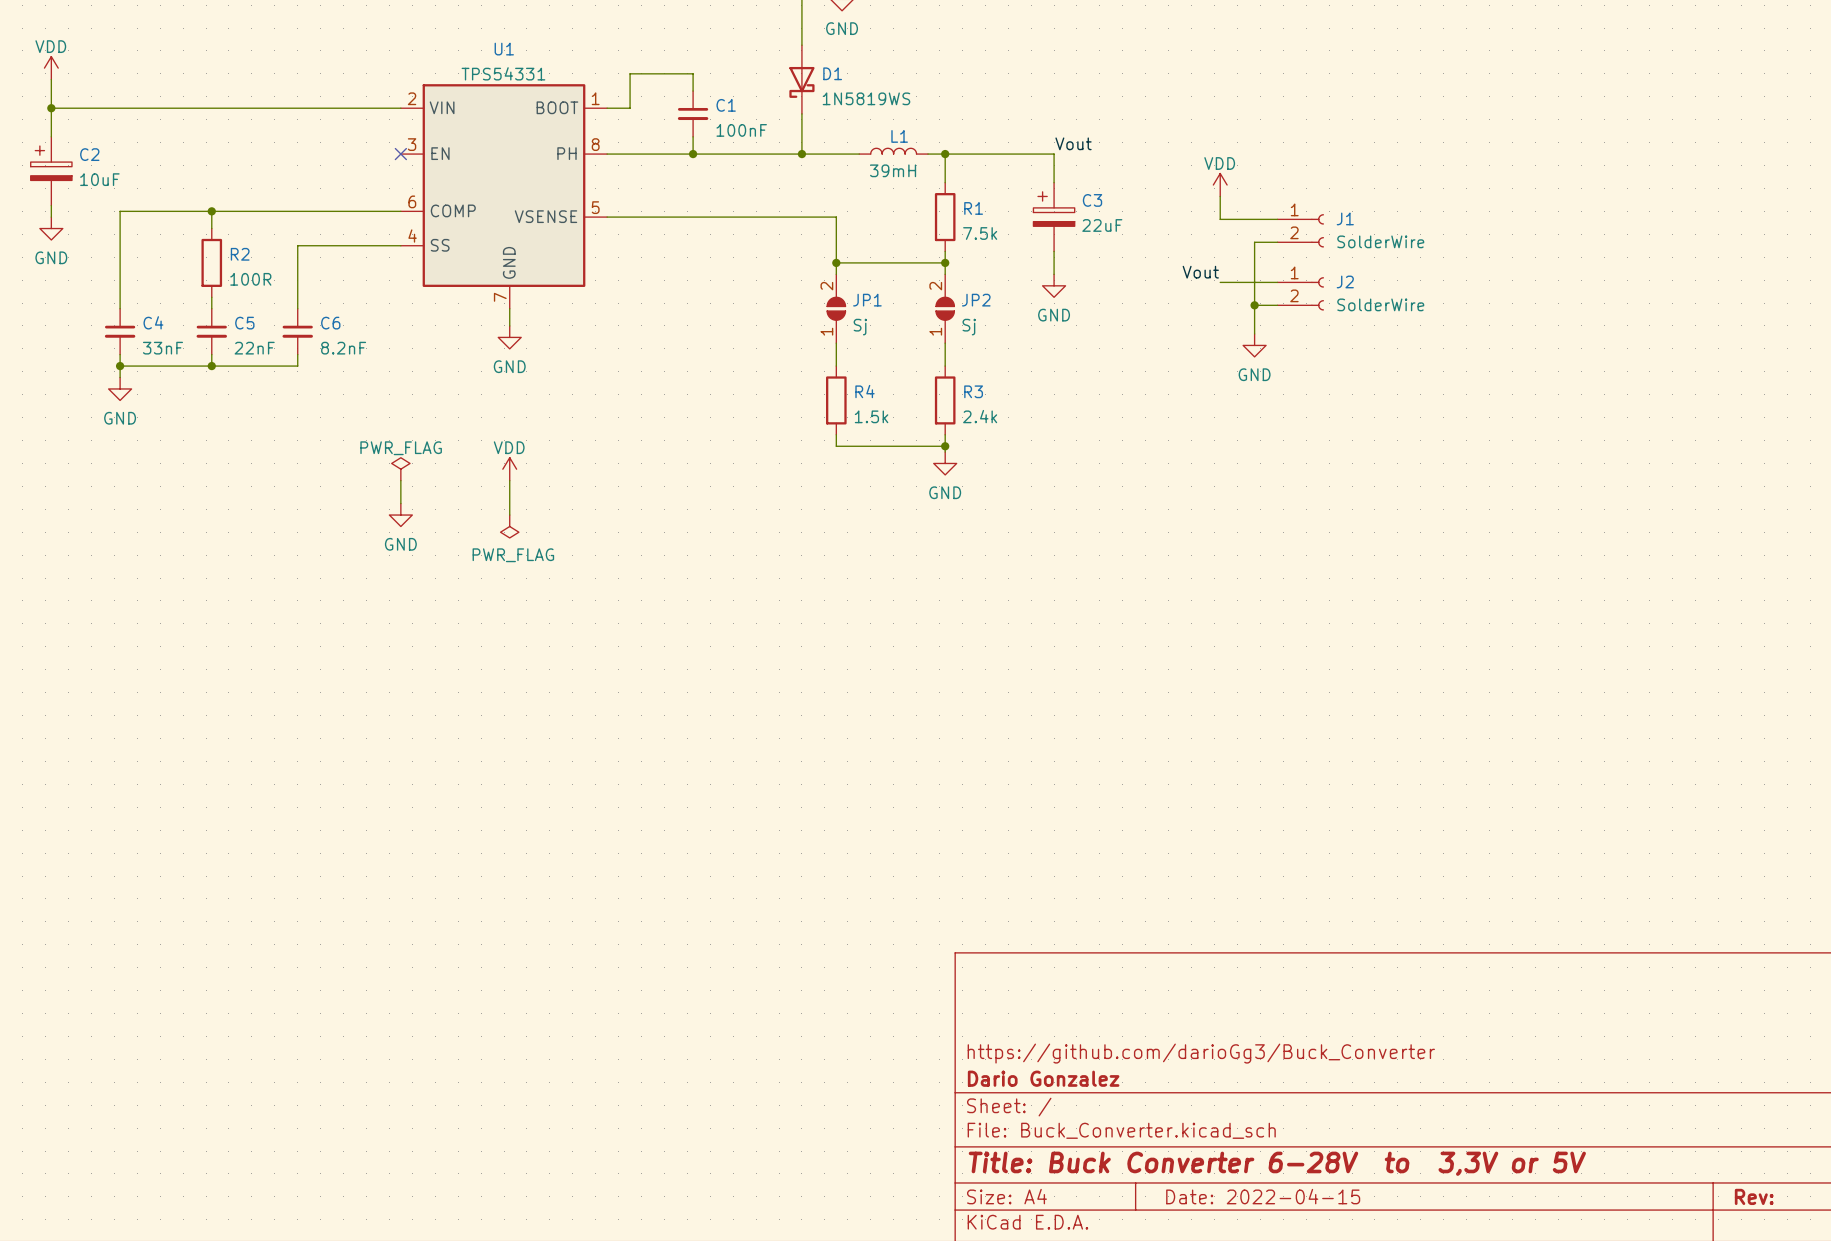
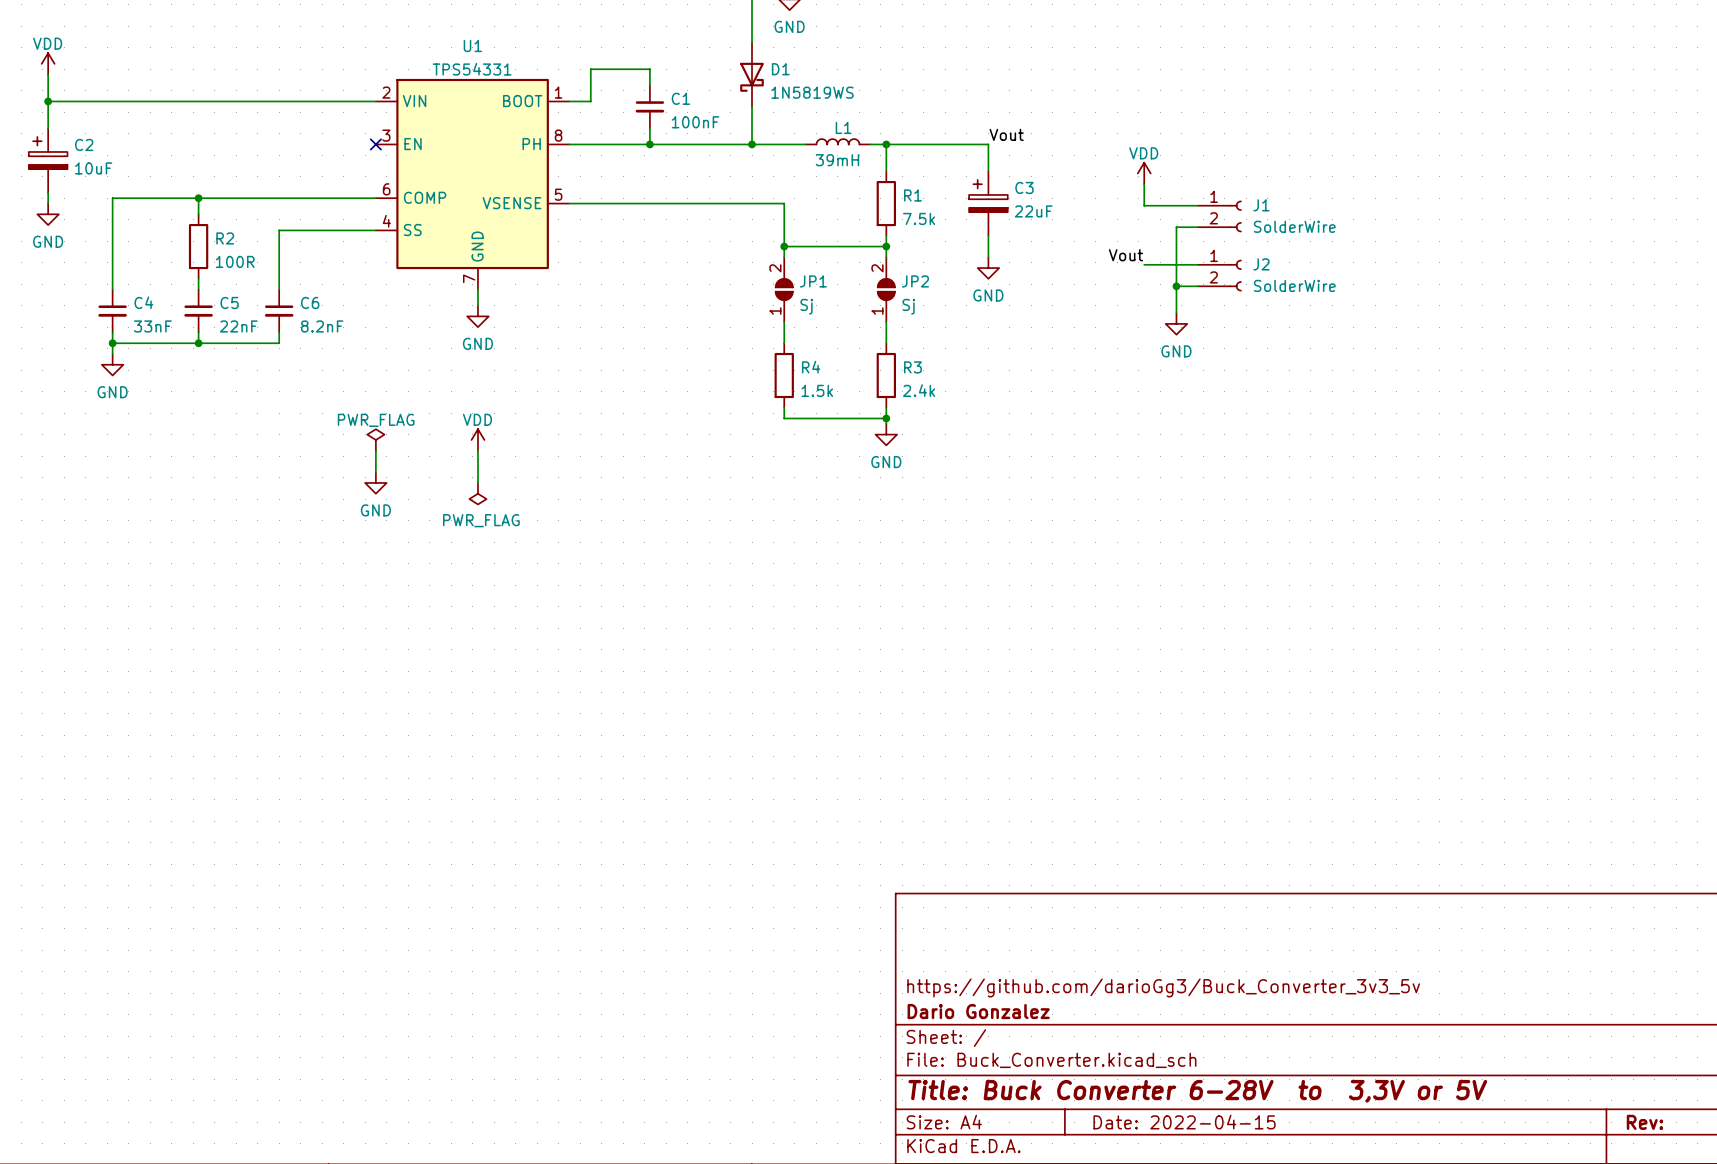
title block: https://github.com/darioGg3/Buck_Converter (1201, 1053) -> https://github.com/darioGg3/Buck_Converter_3v3_5v (1163, 987)

